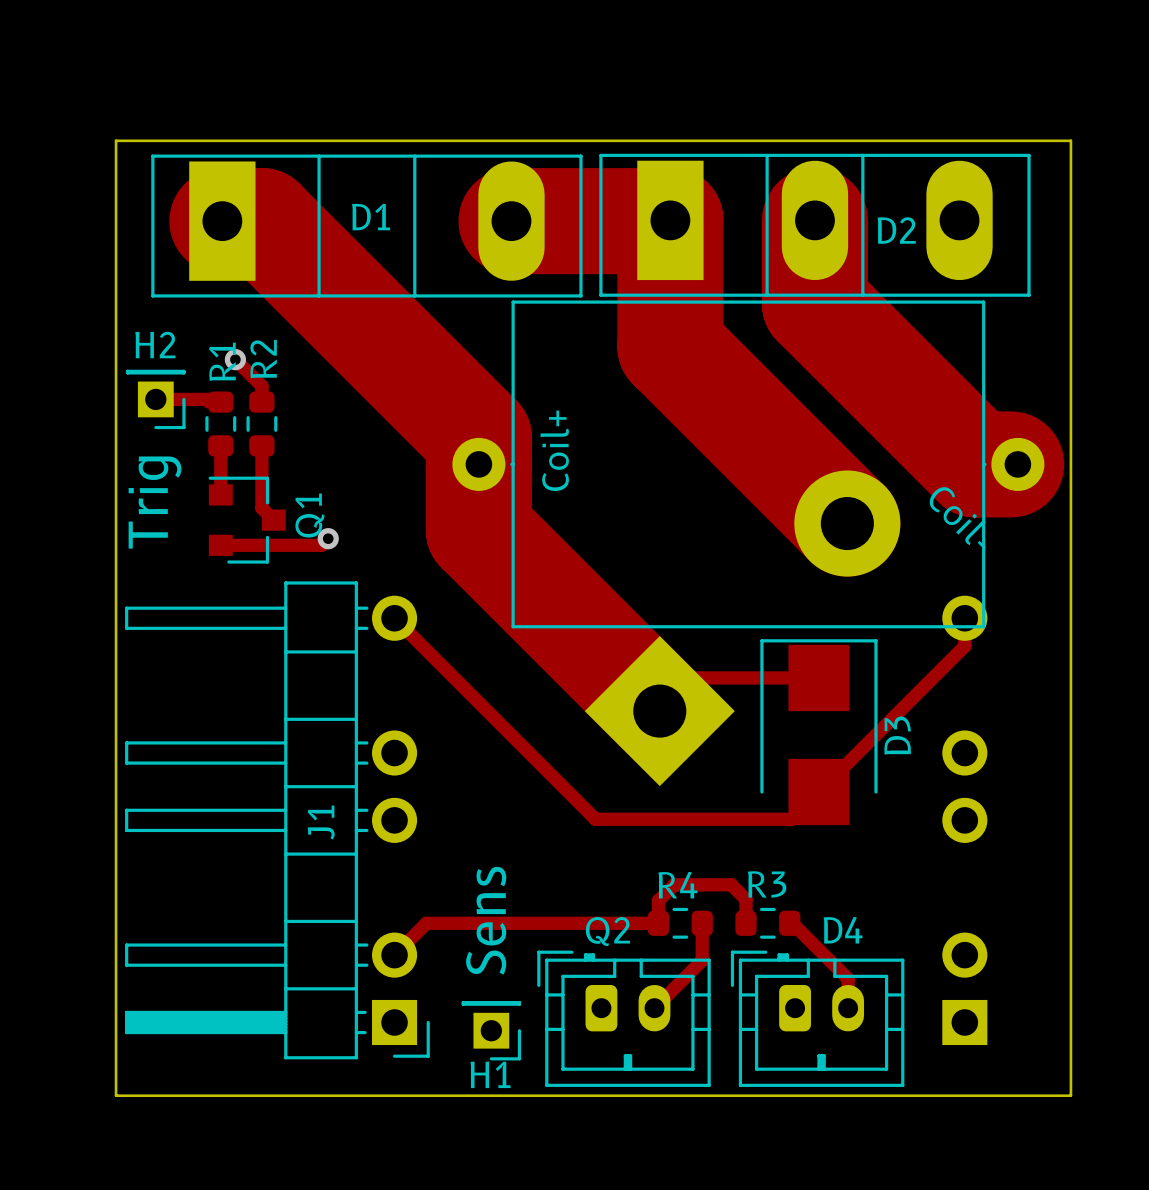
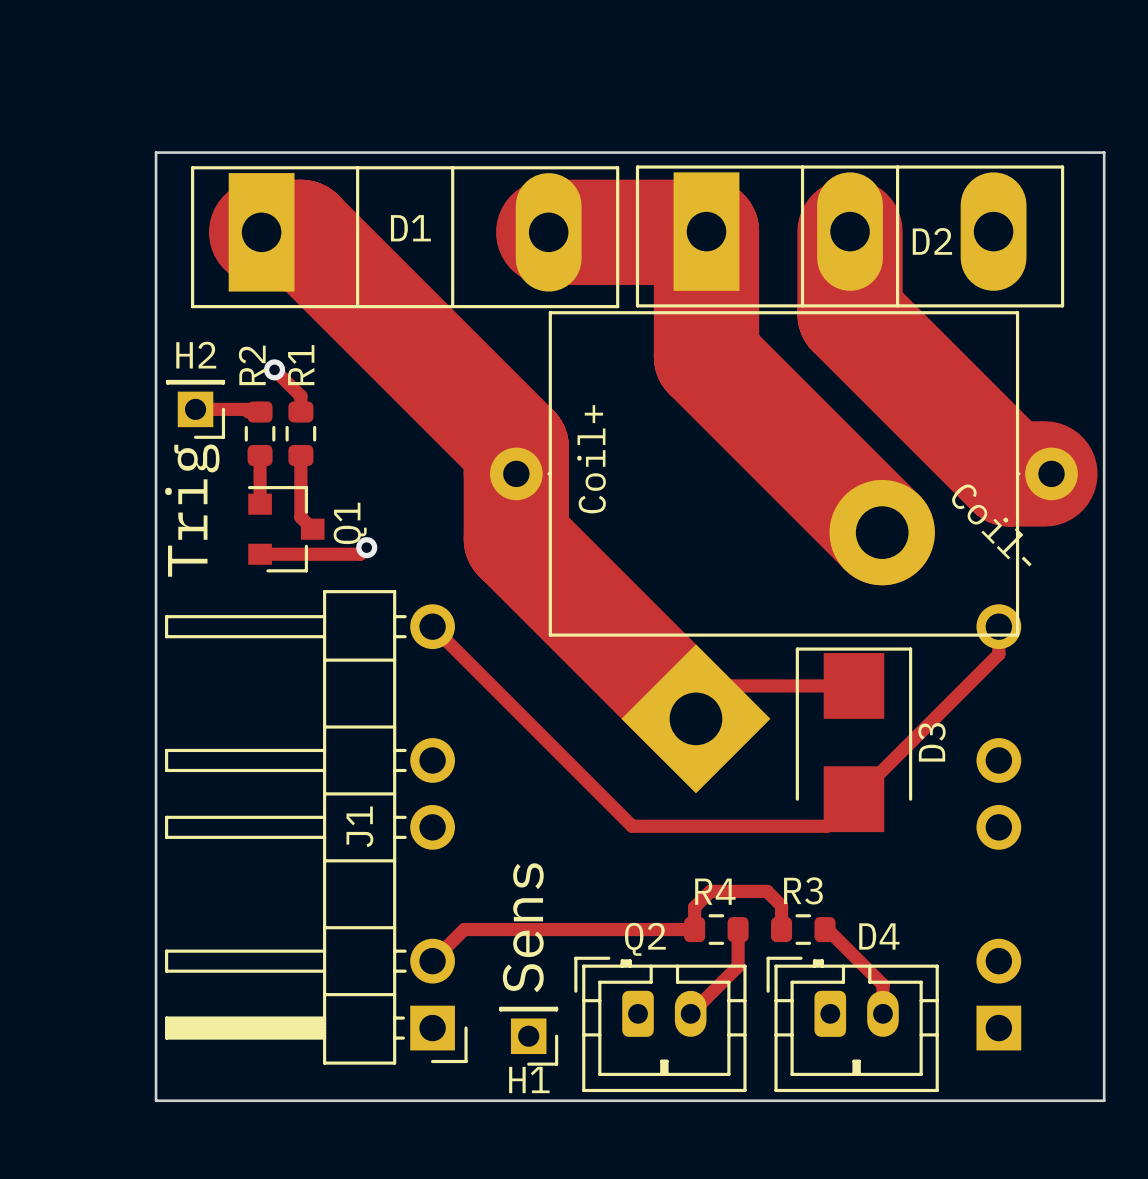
R2 name position: R2 (263, 359) -> R2 (252, 365)
R1 name position: R1 (222, 361) -> R1 (301, 365)

